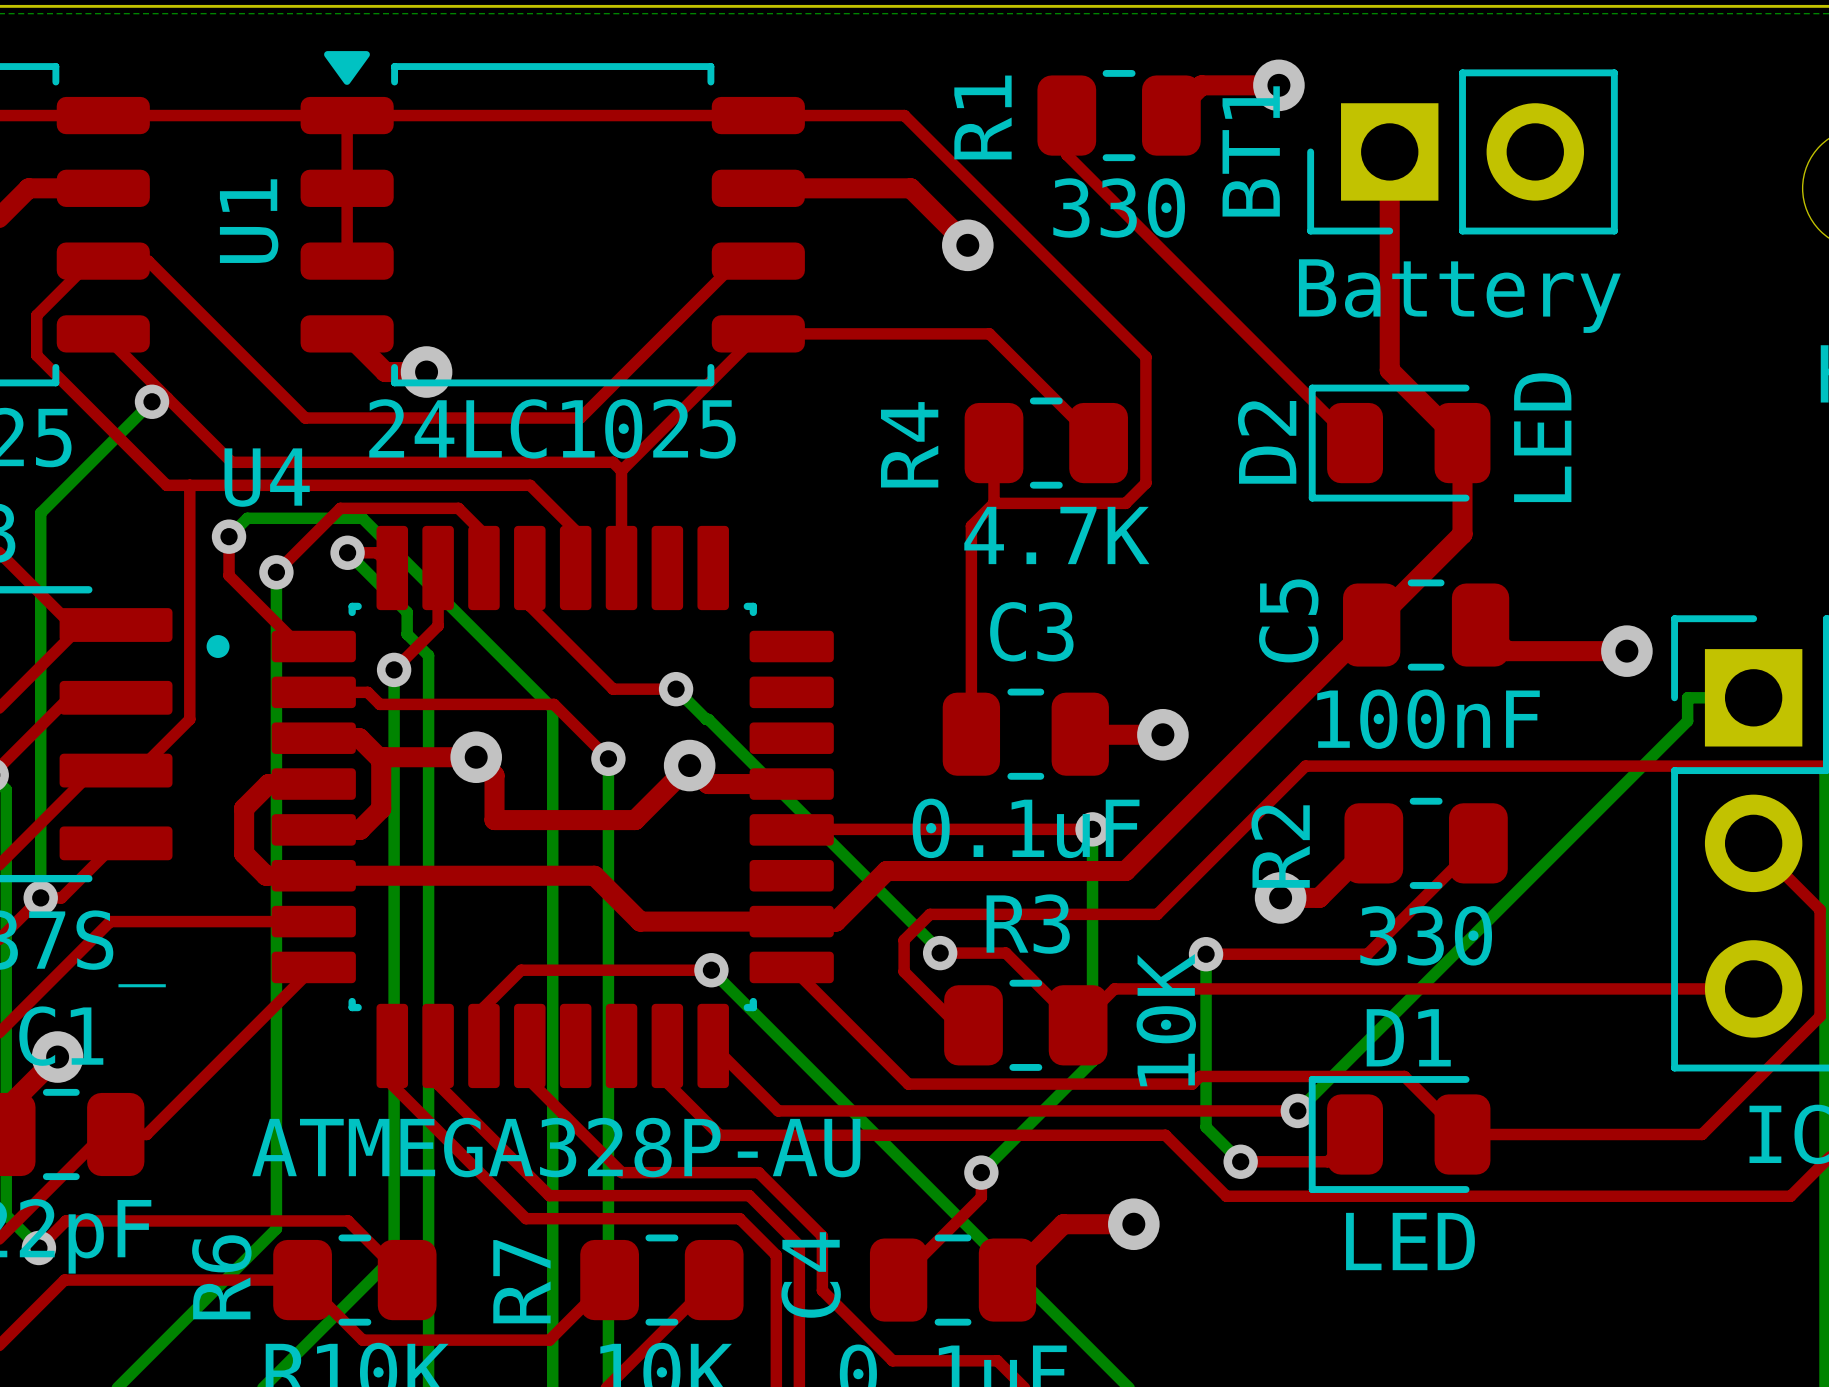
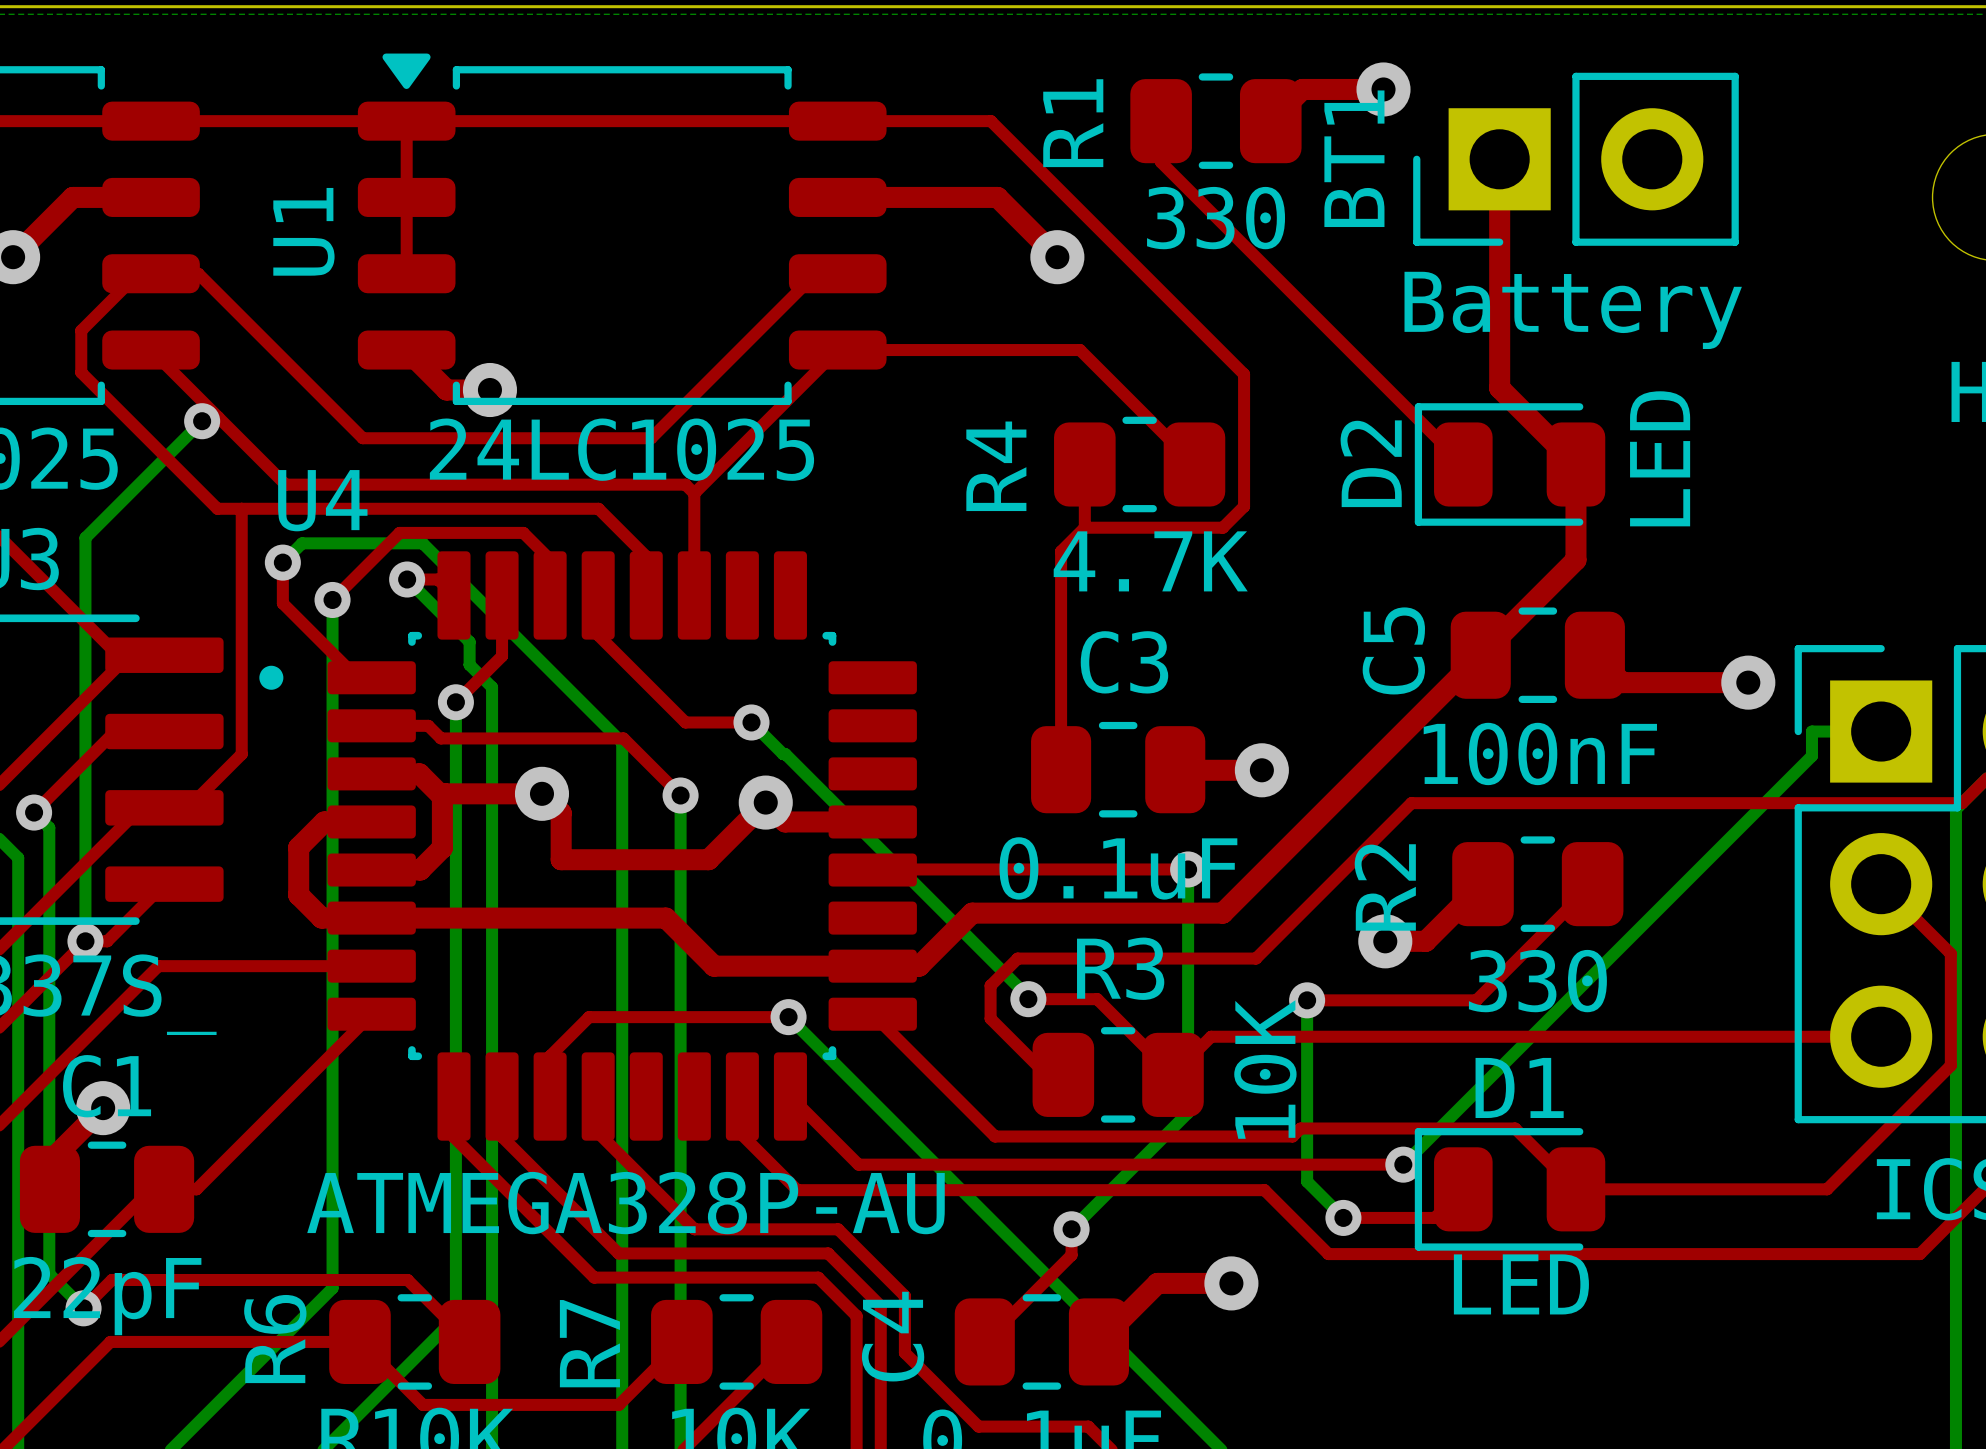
D1 value position: LED (1410, 1241) -> LED (1521, 1284)

